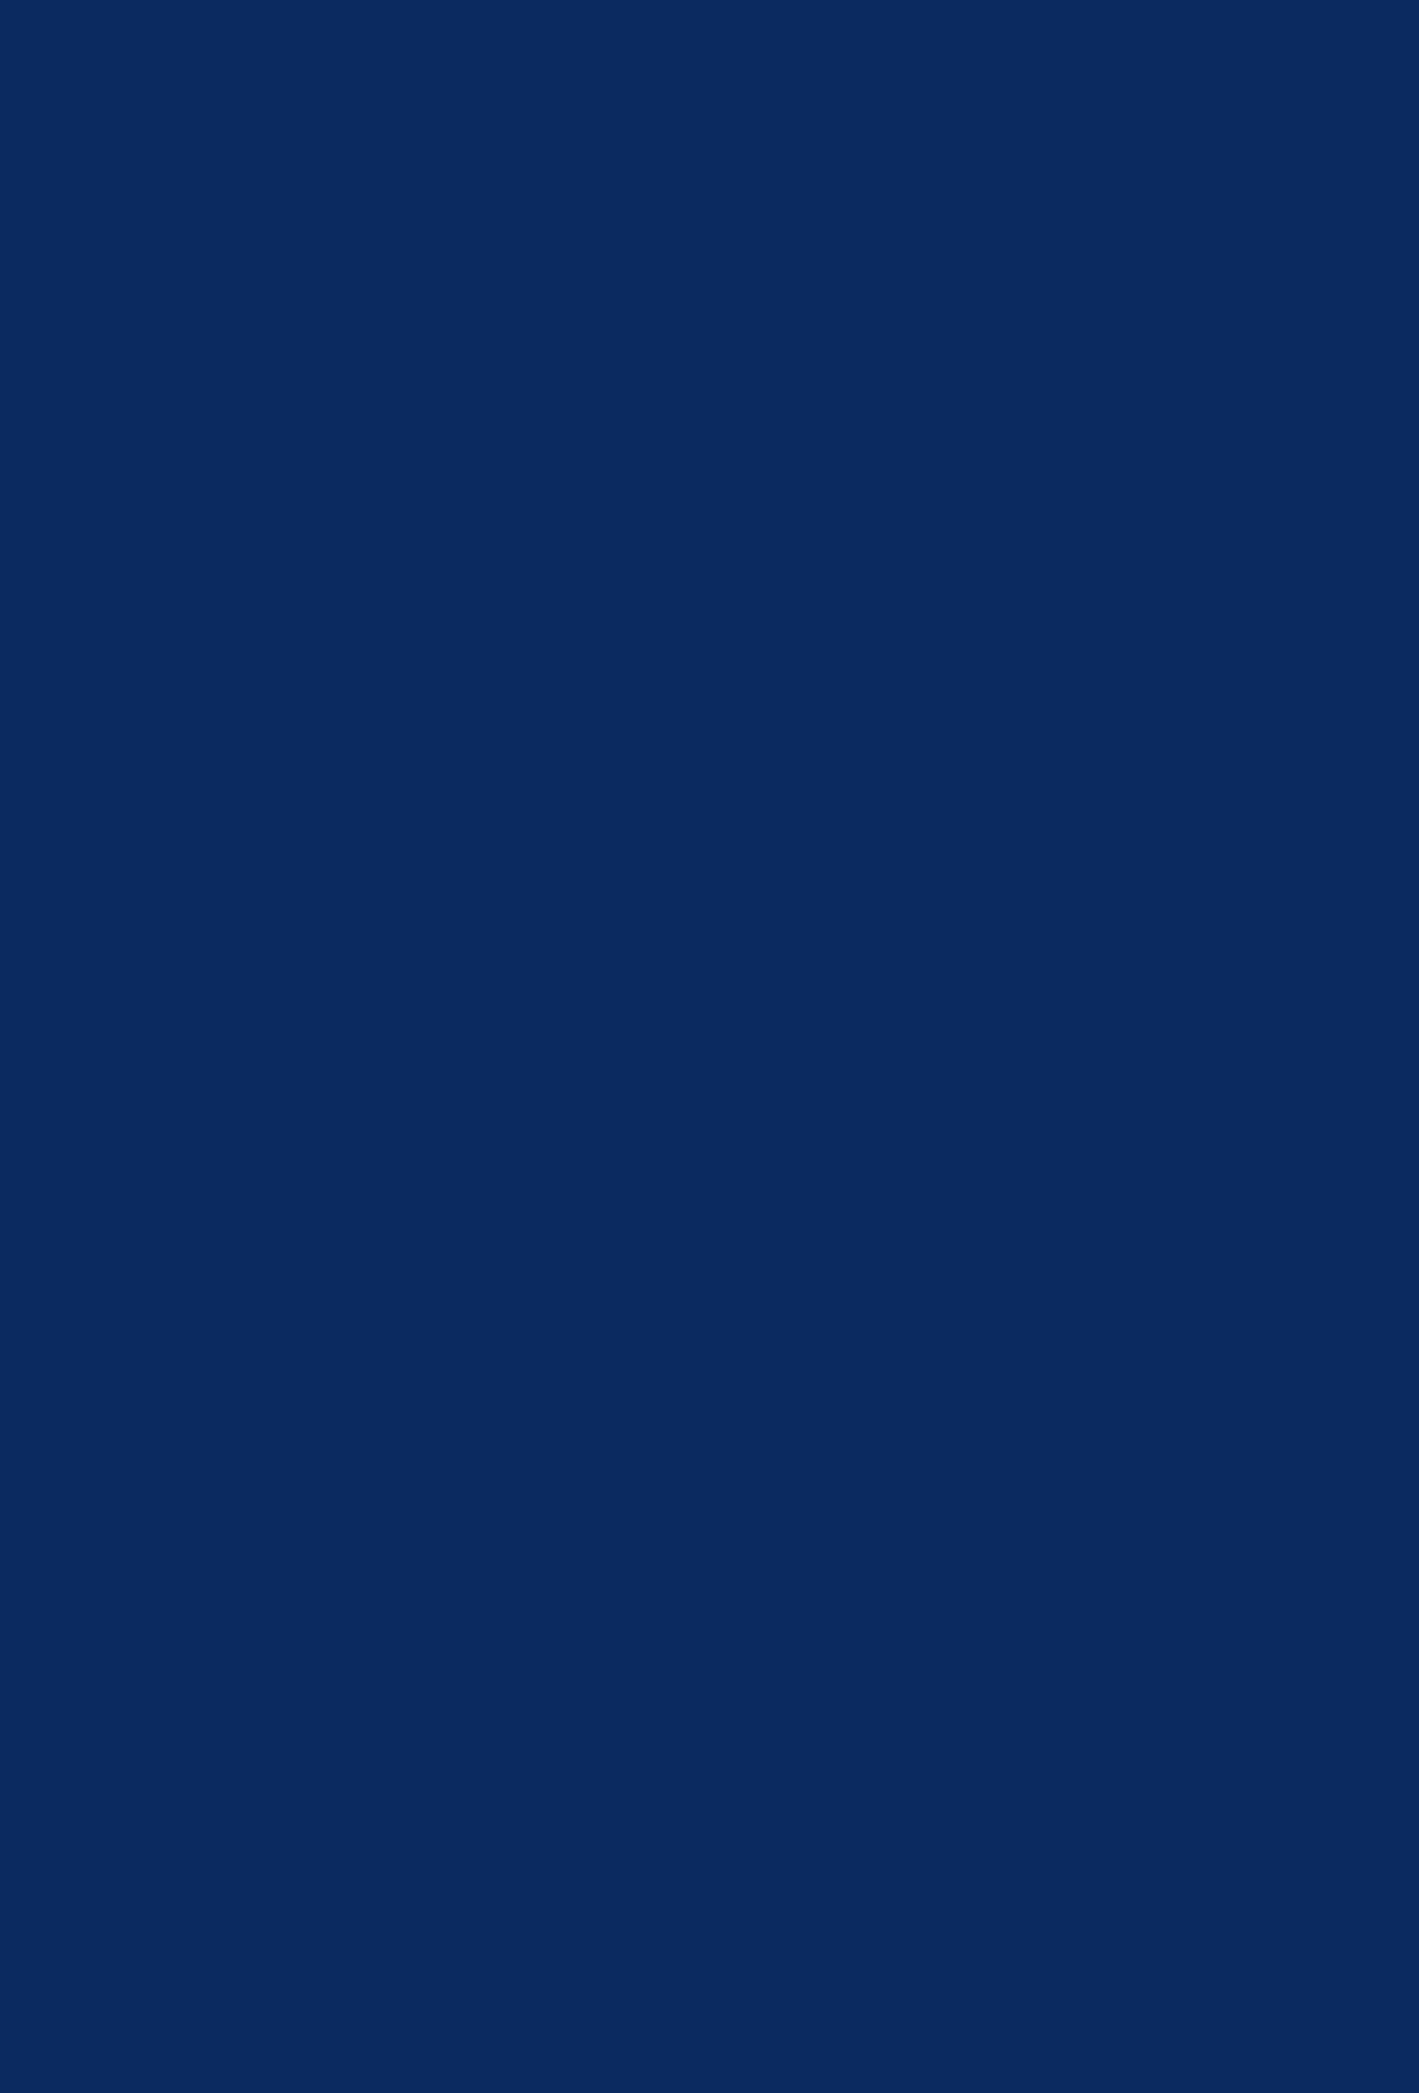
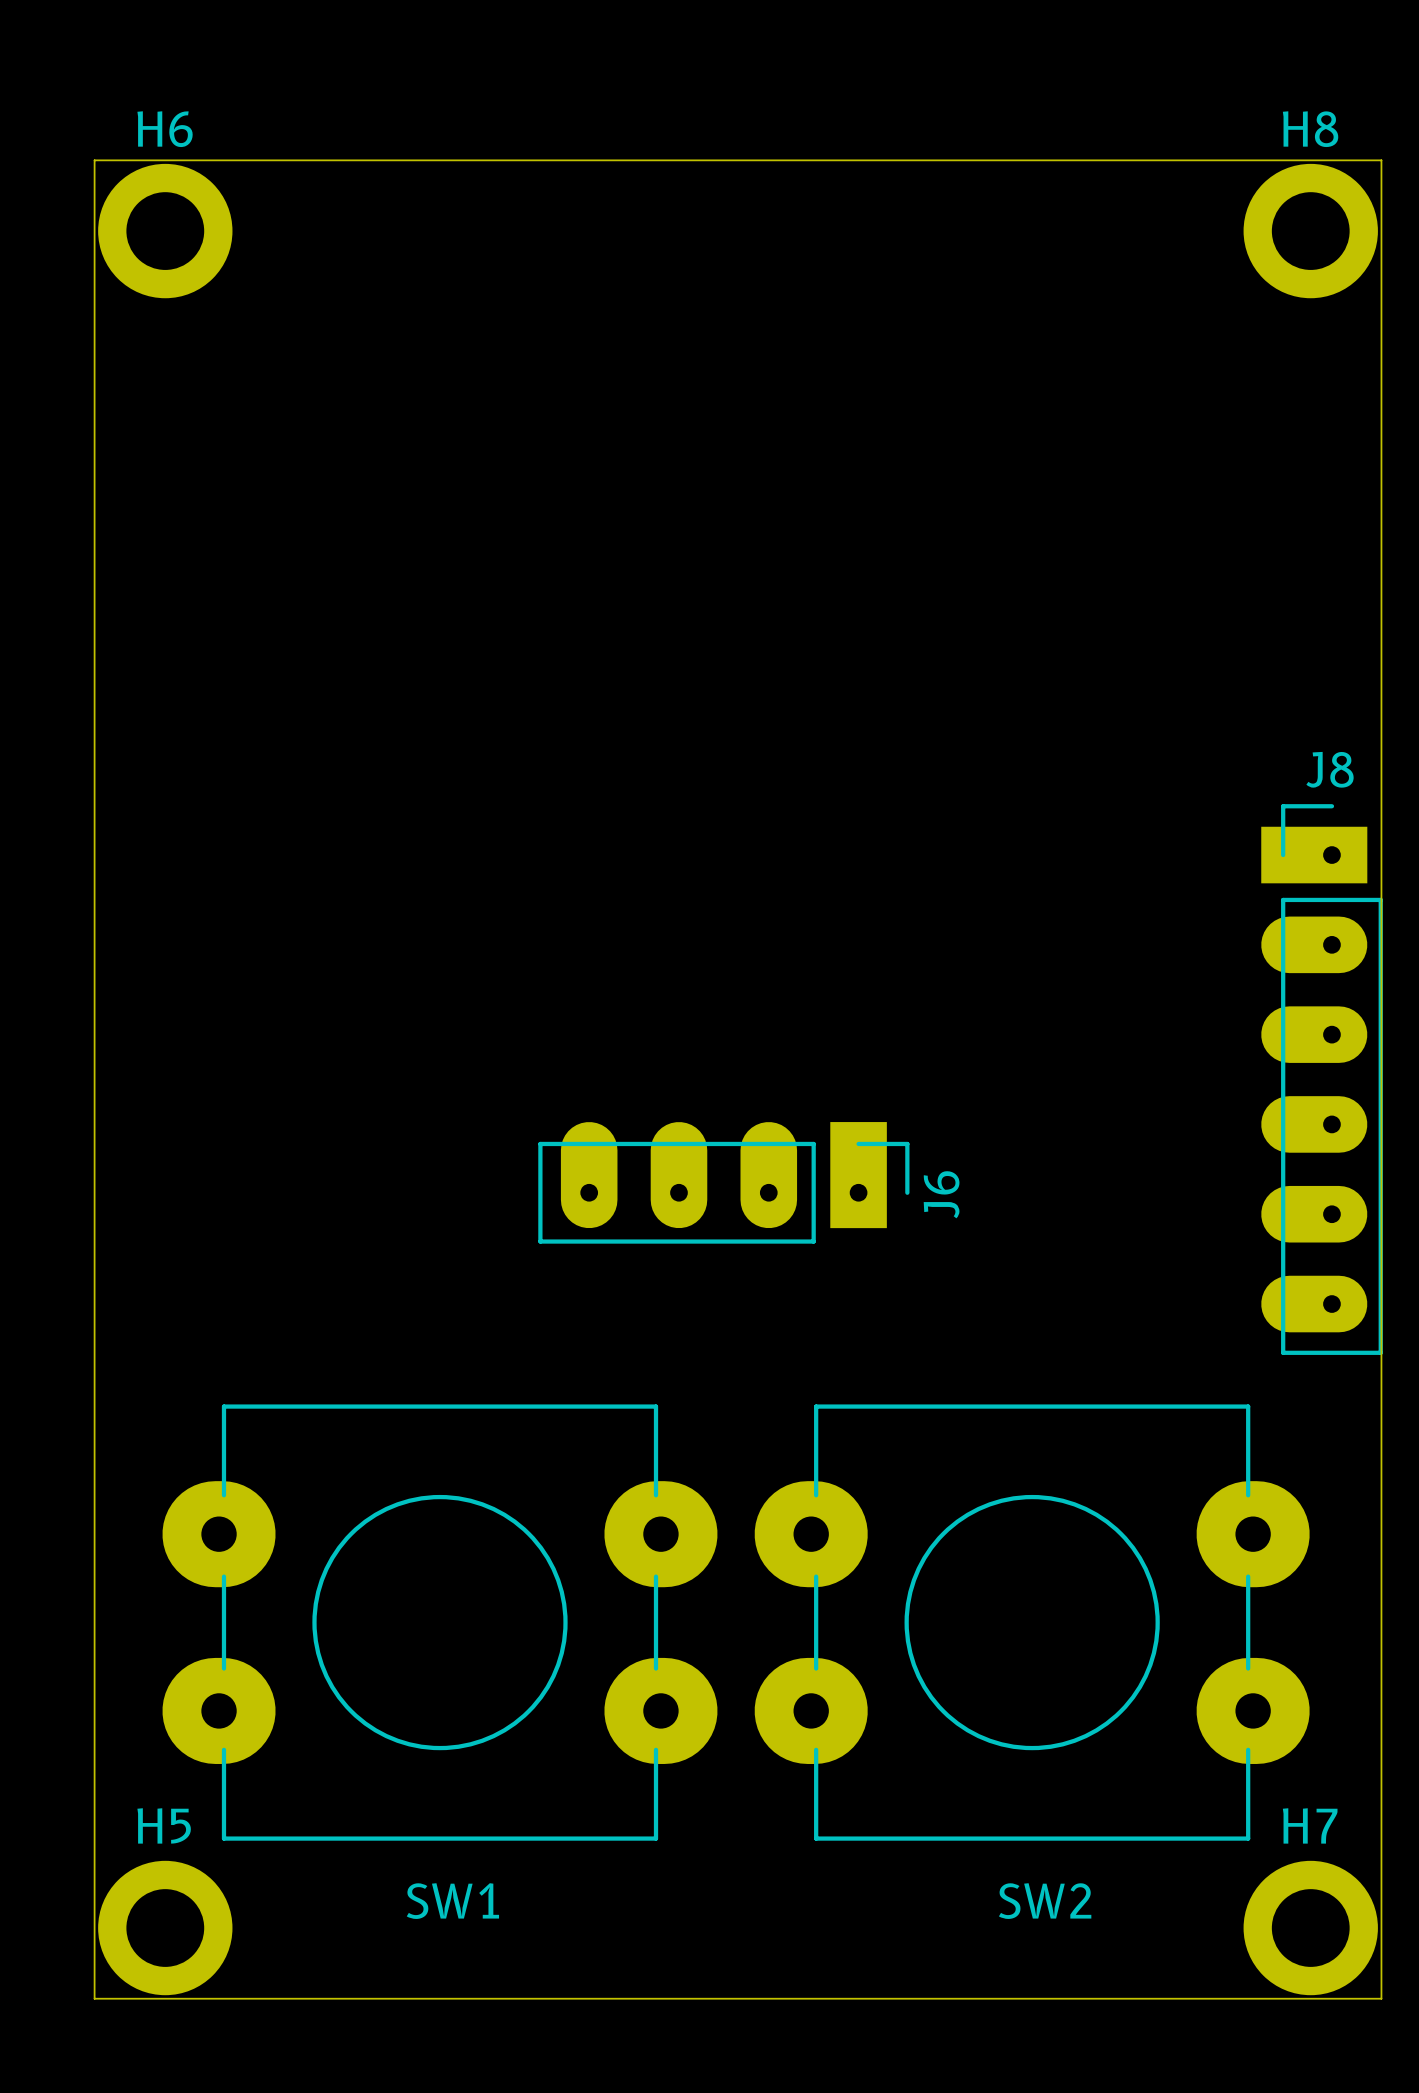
board edge: none -> (94, 160) (94, 1998) (1381, 1998) (1381, 160) (94, 160)
H6: none -> (165, 231)
H8: none -> (1310, 231)
J8: none -> (1322, 1079)
J6: none -> (723, 1182)
SW1: none -> (439, 1622)
SW2: none -> (1032, 1622)
H5: none -> (165, 1928)
H7: none -> (1310, 1928)

